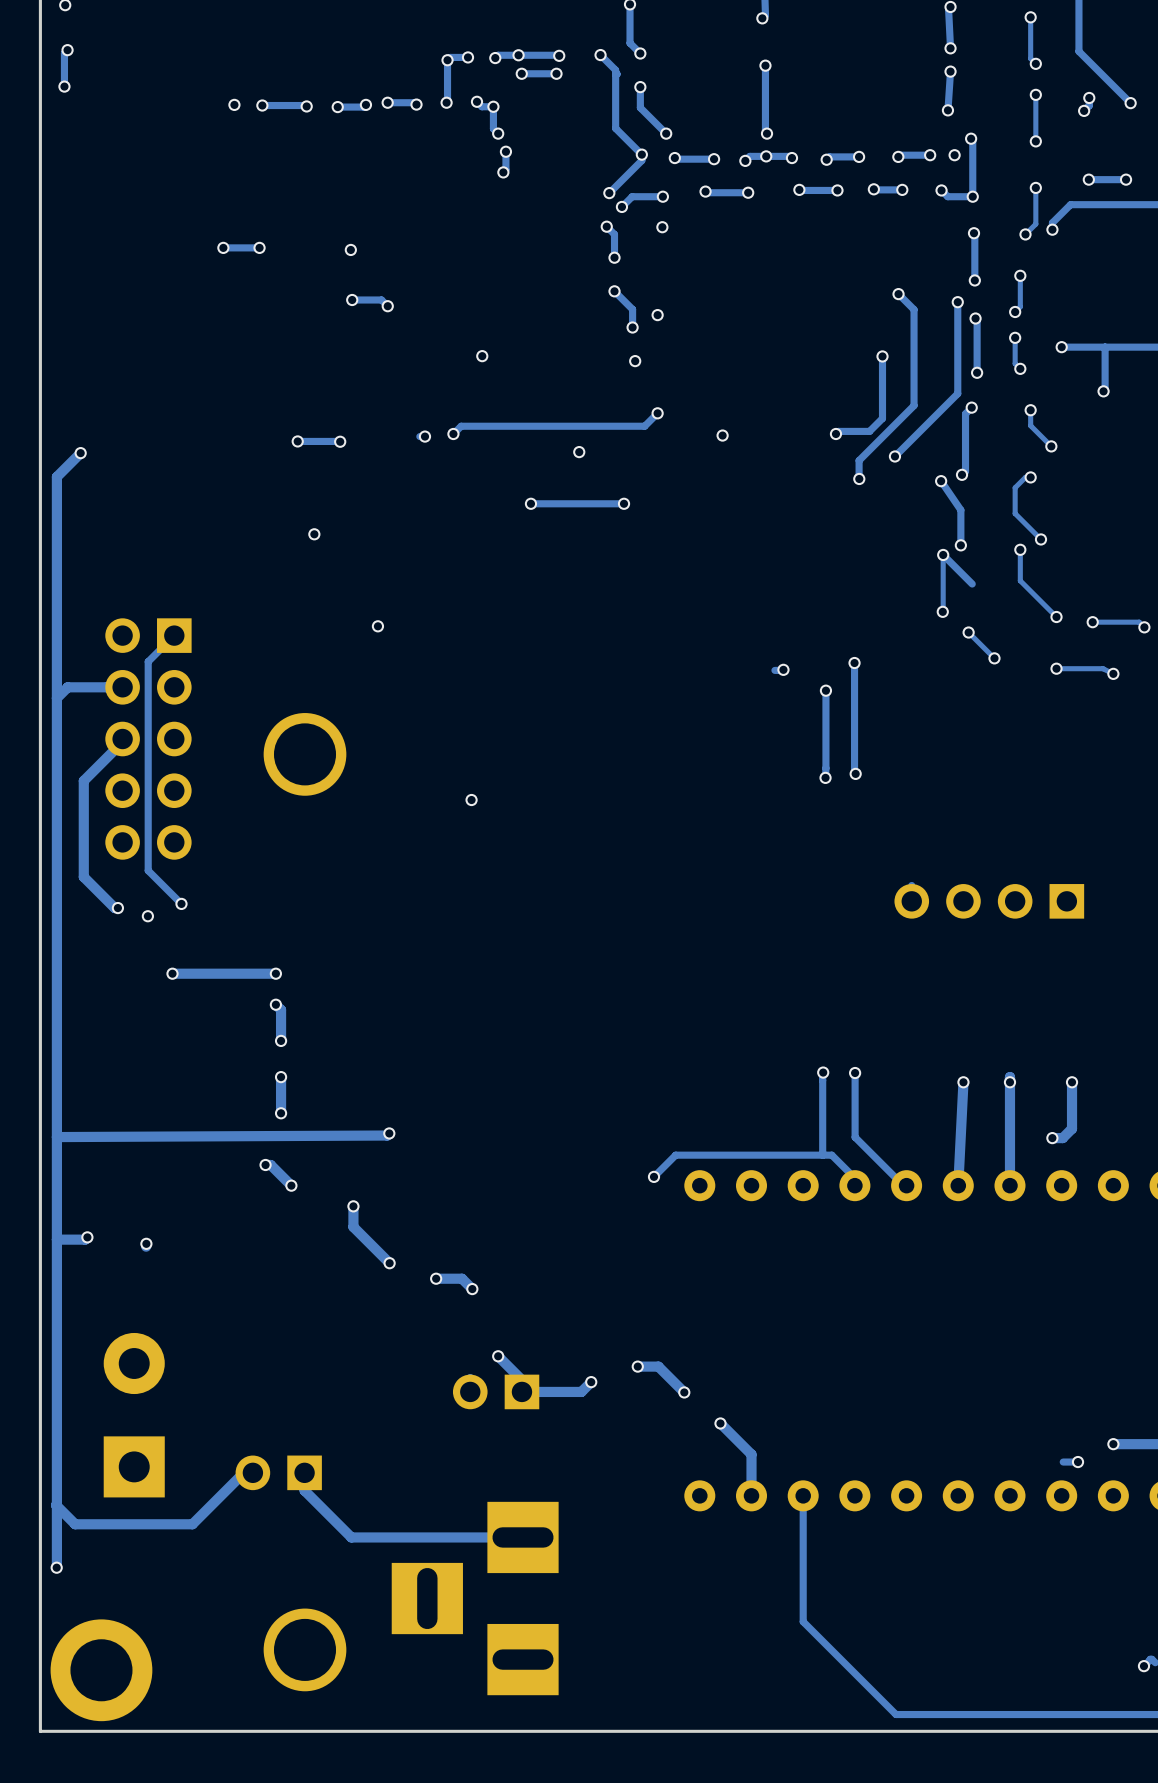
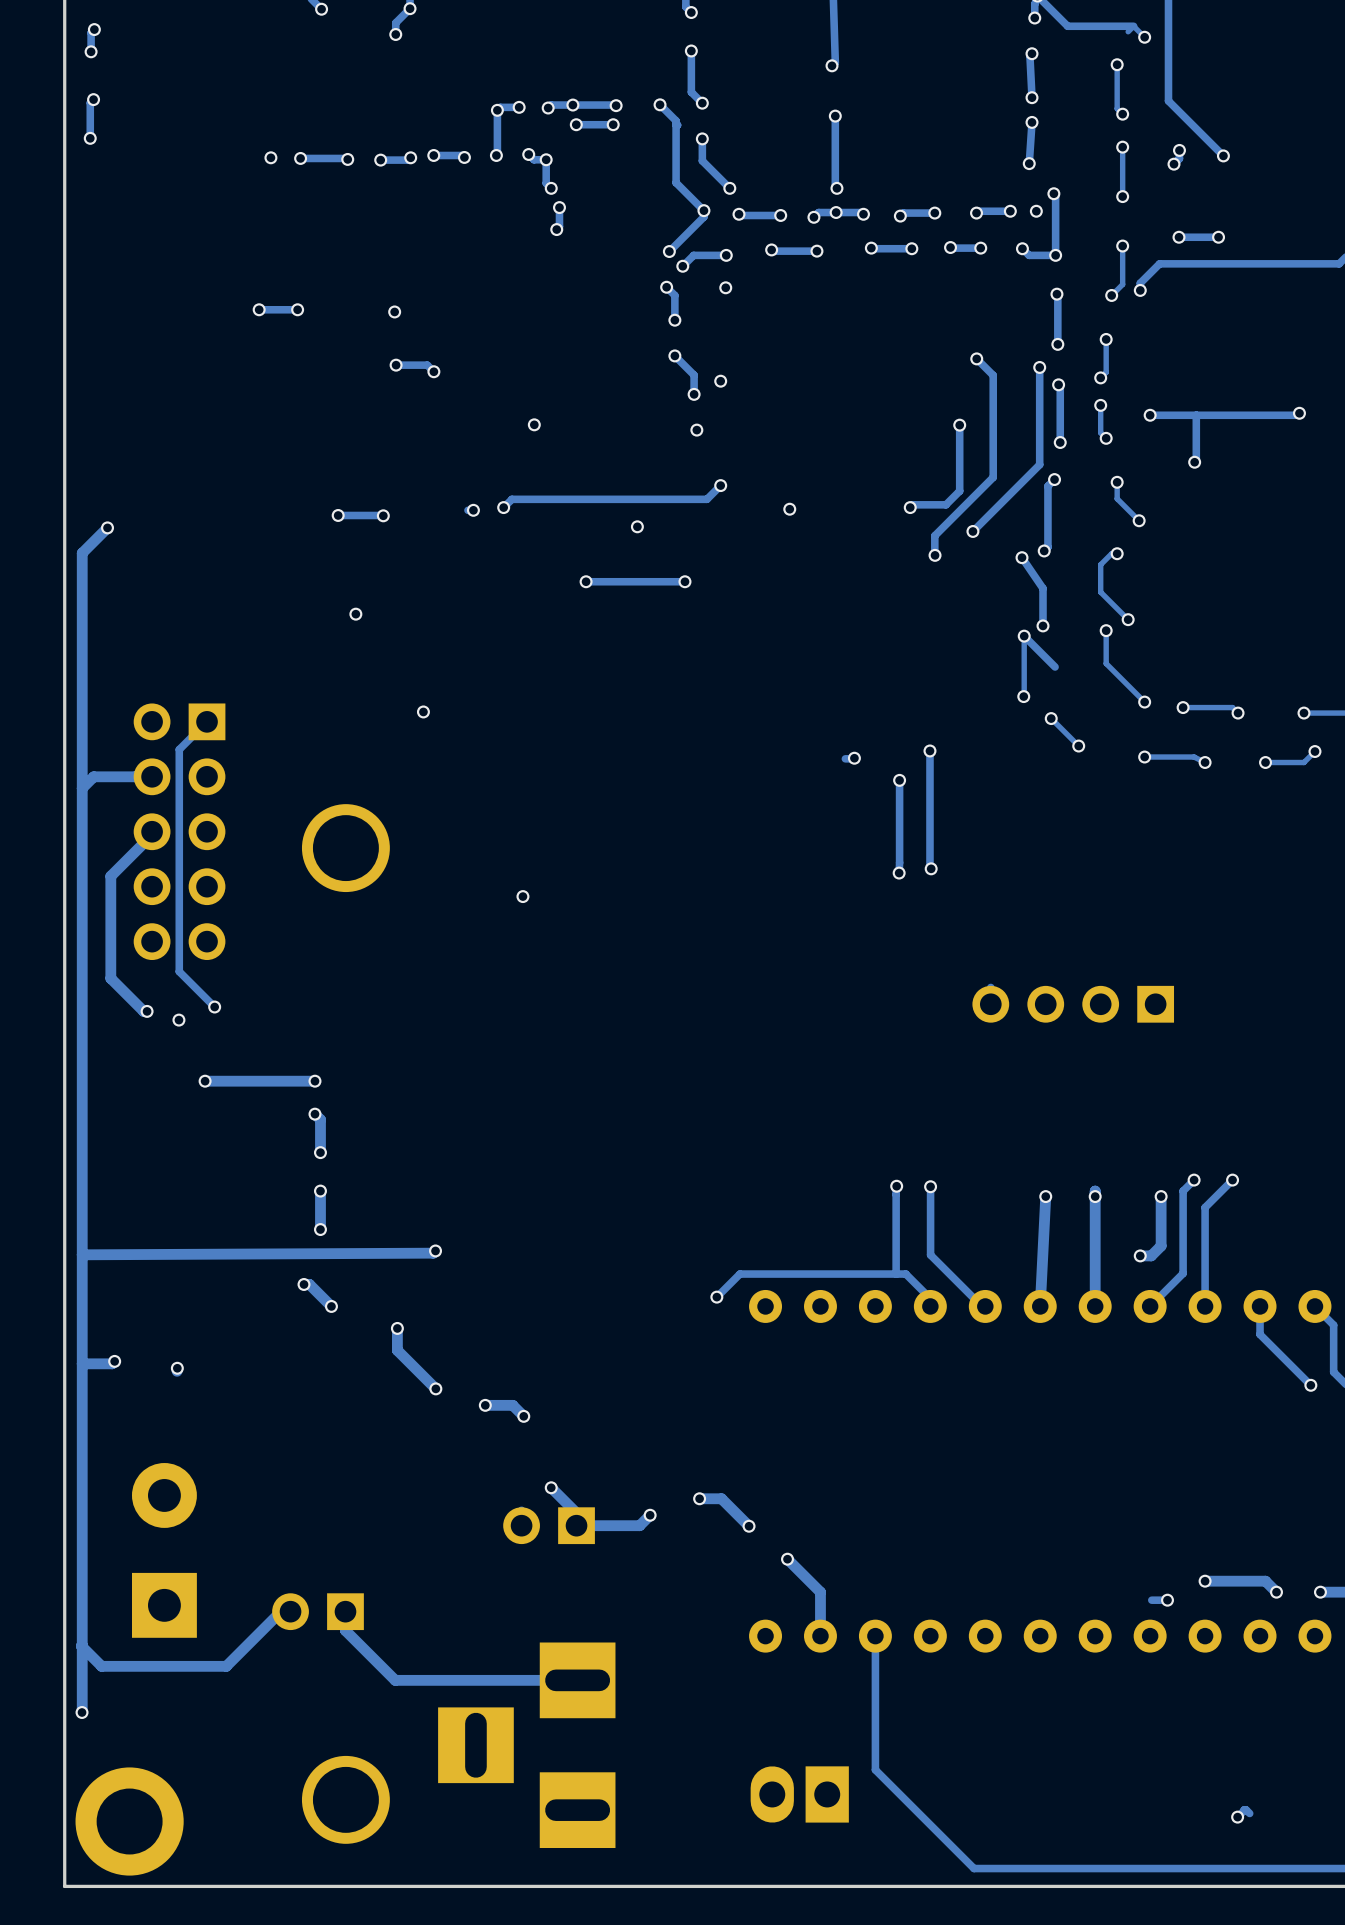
track: none -> (1194, 1180) (1183, 1191) (1183, 1273) (1150, 1306)
via: none -> (1194, 1180)
track: none -> (1232, 1180) (1205, 1207) (1205, 1306)
via: none -> (1232, 1180)
part: none -> (799, 1794)

